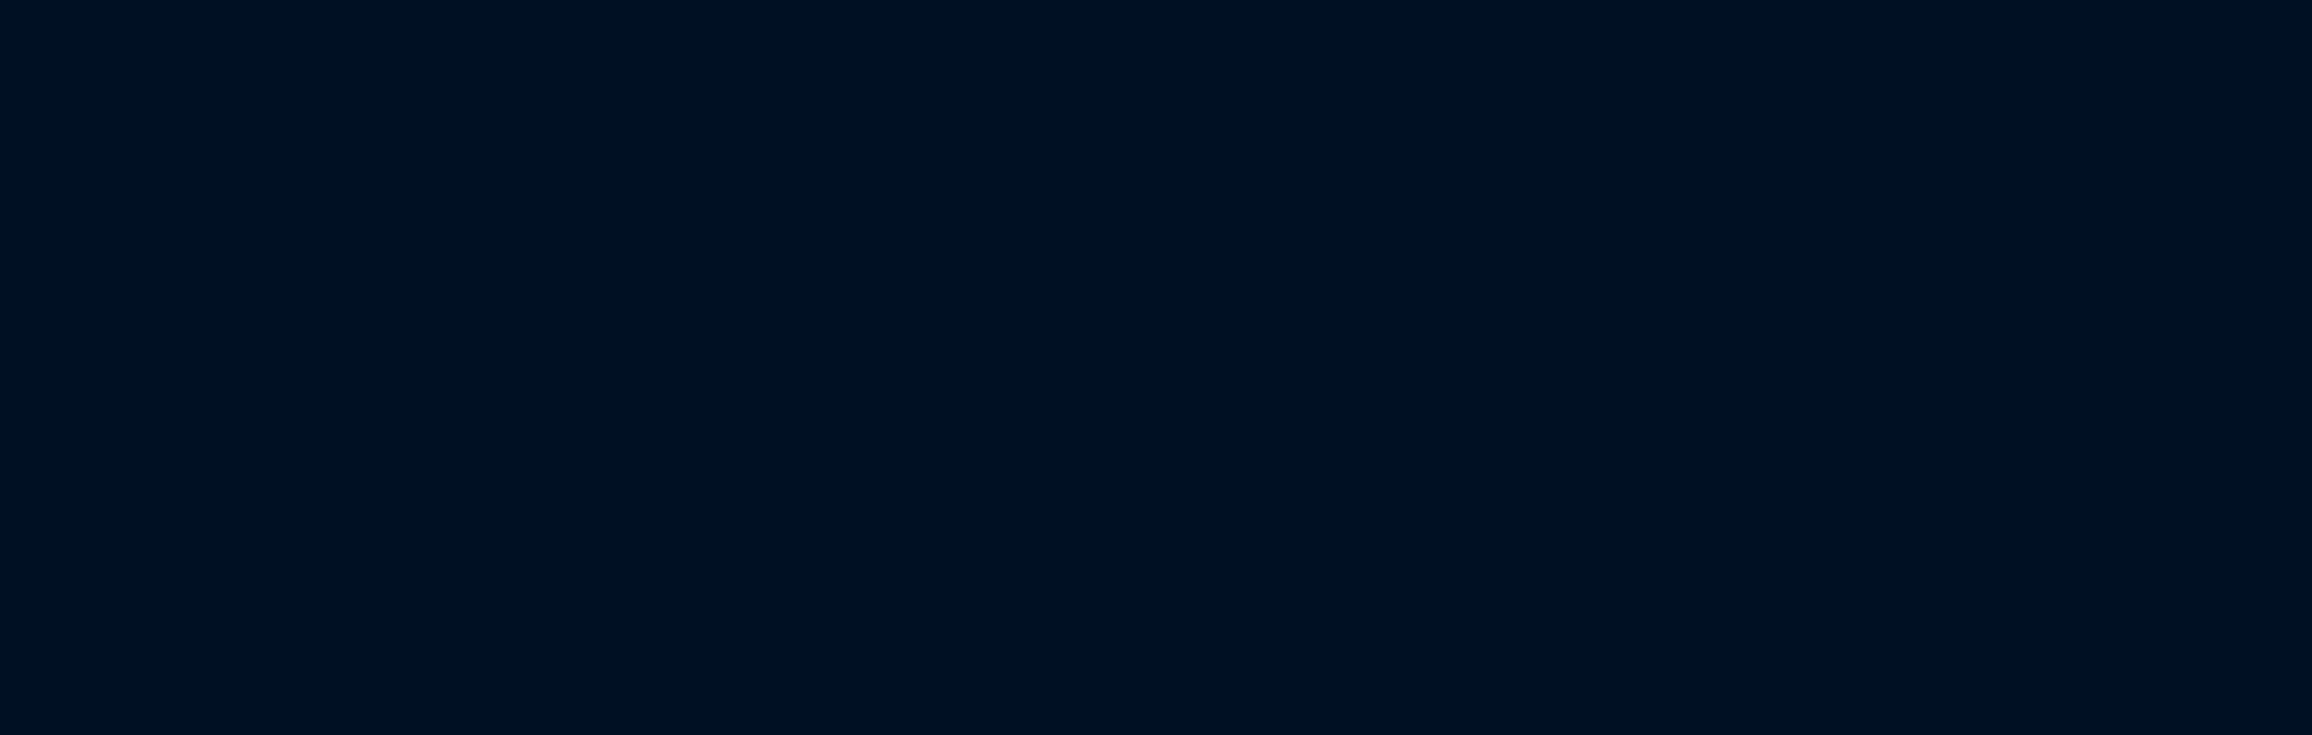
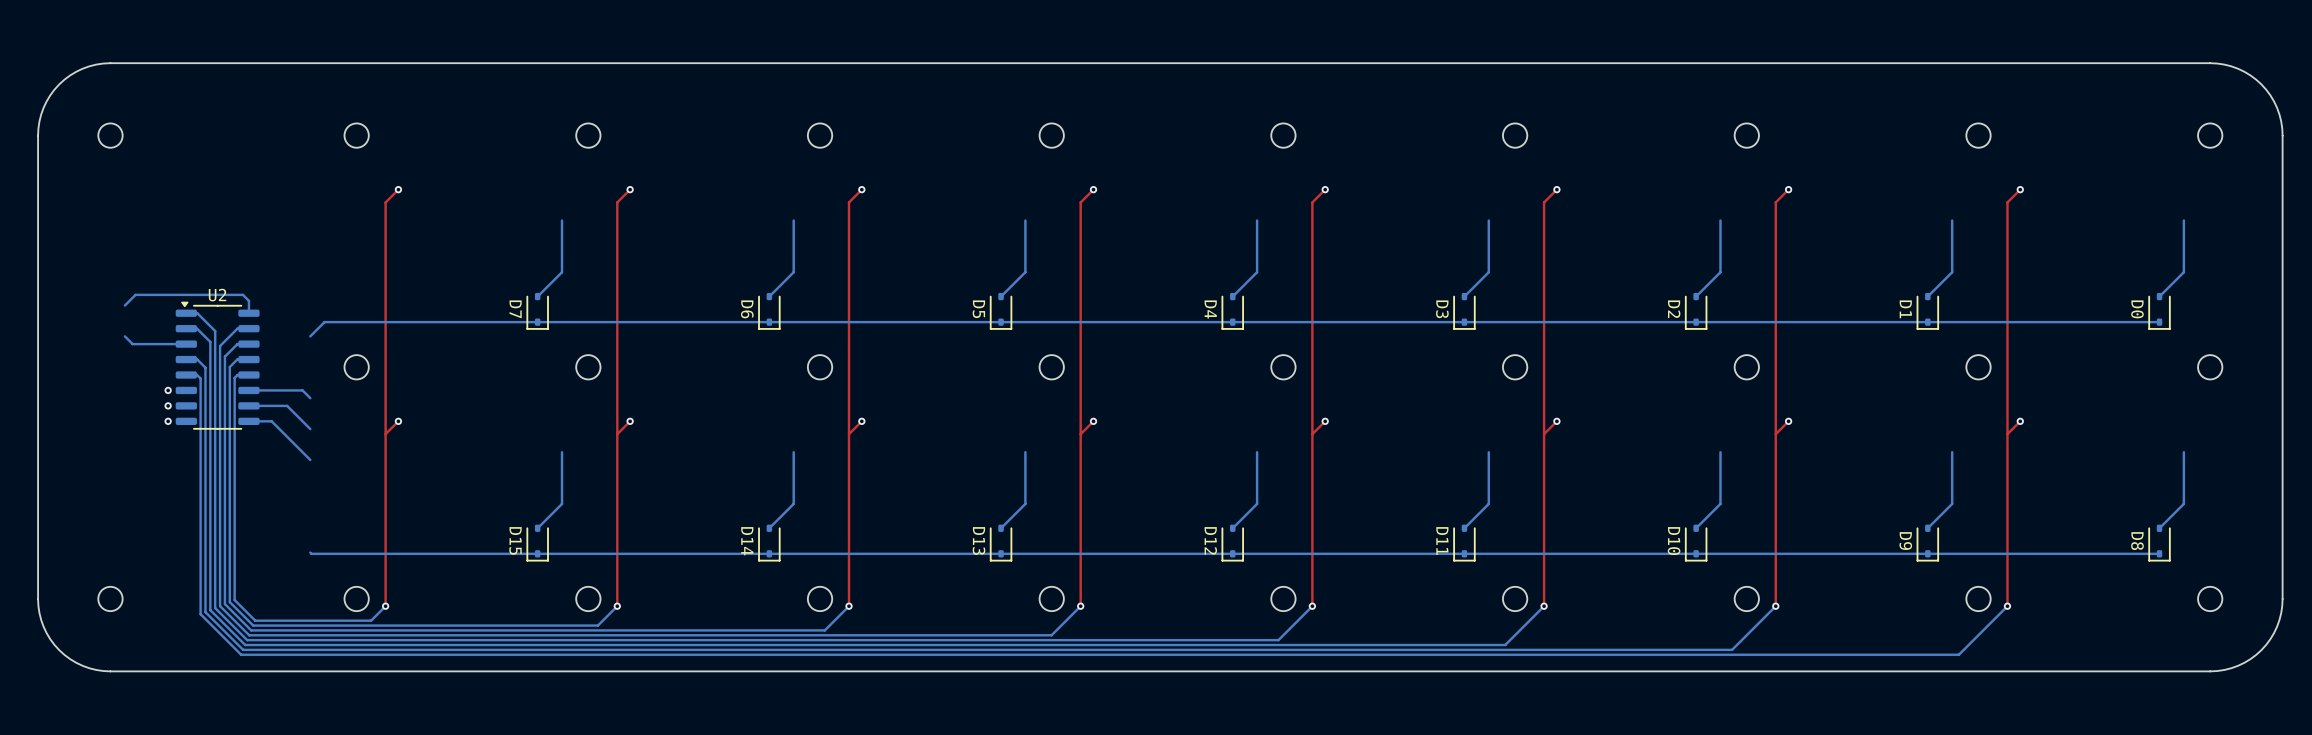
board edge: none -> (2210, 63) (110, 63) (89, 66) (70, 75) (54, 89) (43, 107) (38, 128) (38, 598) (41, 619) (50, 639) (64, 654) (82, 665) (110, 671) (2210, 671) (2231, 668) (2250, 659) (2266, 644) (2277, 626) (2282, 606) (2282, 135) (2277, 107) (2261, 84) (2237, 68) (2210, 63)
round board edge: none -> [98, 123, 123, 149]
round board edge: none -> [344, 123, 370, 149]
round board edge: none -> [575, 123, 601, 149]
round board edge: none -> [807, 123, 833, 149]
round board edge: none -> [1039, 123, 1065, 149]
round board edge: none -> [1270, 123, 1296, 149]
round board edge: none -> [1502, 123, 1528, 149]
round board edge: none -> [1734, 123, 1760, 149]
round board edge: none -> [1966, 123, 1991, 149]
round board edge: none -> [2197, 123, 2223, 149]
top track: none -> (398, 189) (385, 202) (385, 606)
via: none -> (398, 189)
top track: none -> (630, 189) (617, 202) (617, 606)
via: none -> (630, 189)
top track: none -> (861, 189) (849, 202) (849, 606)
via: none -> (861, 189)
top track: none -> (1093, 189) (1080, 202) (1080, 606)
via: none -> (1093, 189)
top track: none -> (1325, 189) (1312, 202) (1312, 606)
via: none -> (1325, 189)
top track: none -> (1556, 189) (1544, 202) (1544, 606)
via: none -> (1556, 189)
top track: none -> (1788, 189) (1775, 202) (1775, 606)
via: none -> (1788, 189)
top track: none -> (2020, 189) (2007, 202) (2007, 606)
via: none -> (2020, 189)
bottom track: none -> (562, 220) (562, 272) (537, 296)
bottom track: none -> (793, 220) (793, 272) (769, 296)
bottom track: none -> (1025, 220) (1025, 272) (1001, 296)
bottom track: none -> (1257, 220) (1257, 272) (1232, 296)
bottom track: none -> (1488, 220) (1488, 272) (1464, 296)
bottom track: none -> (1720, 220) (1720, 272) (1696, 296)
bottom track: none -> (1952, 220) (1952, 272) (1927, 296)
bottom track: none -> (2183, 220) (2183, 272) (2159, 296)
bottom track: none -> (124, 305) (135, 294) (242, 294) (248, 300) (248, 313)
D7: none -> (537, 311)
D6: none -> (769, 311)
D5: none -> (1001, 311)
D4: none -> (1232, 311)
D3: none -> (1464, 311)
D2: none -> (1696, 311)
D1: none -> (1927, 311)
D0: none -> (2159, 311)
bottom track: none -> (186, 313) (197, 313) (215, 331) (215, 608) (247, 640) (1278, 640) (1312, 606)
bottom track: none -> (2159, 322) (324, 322) (310, 336)
bottom track: none -> (186, 328) (197, 328) (210, 341) (210, 610) (245, 645) (1505, 645) (1544, 606)
bottom track: none -> (248, 328) (237, 328) (220, 346) (220, 606) (249, 635) (1051, 635) (1080, 606)
bottom track: none -> (124, 336) (132, 344) (186, 344)
bottom track: none -> (248, 344) (237, 344) (224, 356) (224, 604) (251, 630) (824, 630) (849, 606)
round board edge: none -> [344, 354, 370, 380]
round board edge: none -> [575, 354, 601, 380]
round board edge: none -> [807, 354, 833, 380]
round board edge: none -> [1039, 354, 1065, 380]
round board edge: none -> [1270, 354, 1296, 380]
round board edge: none -> [1502, 354, 1528, 380]
round board edge: none -> [1734, 354, 1760, 380]
round board edge: none -> [1966, 354, 1991, 380]
round board edge: none -> [2197, 354, 2223, 380]
bottom track: none -> (186, 359) (197, 359) (205, 367) (205, 612) (243, 649) (1732, 649) (1775, 606)
bottom track: none -> (248, 359) (237, 359) (229, 367) (229, 602) (253, 625) (597, 625) (617, 606)
U2: none -> (217, 365)
bottom track: none -> (186, 375) (197, 375) (200, 378) (200, 614) (241, 654) (1958, 654) (2007, 606)
bottom track: none -> (248, 375) (237, 375) (234, 377) (234, 600) (255, 620) (371, 620) (385, 606)
via: none -> (168, 390)
bottom track: none -> (248, 390) (302, 390) (310, 398)
via: none -> (168, 405)
bottom track: none -> (248, 405) (287, 405) (310, 429)
via: none -> (168, 421)
bottom track: none -> (248, 421) (271, 421) (310, 459)
top track: none -> (398, 421) (385, 434)
via: none -> (398, 421)
top track: none -> (630, 421) (617, 434)
via: none -> (630, 421)
top track: none -> (861, 421) (849, 434)
via: none -> (861, 421)
top track: none -> (1093, 421) (1080, 434)
via: none -> (1093, 421)
top track: none -> (1325, 421) (1312, 434)
via: none -> (1325, 421)
top track: none -> (1556, 421) (1544, 434)
via: none -> (1556, 421)
top track: none -> (1788, 421) (1775, 434)
via: none -> (1788, 421)
top track: none -> (2020, 421) (2007, 434)
via: none -> (2020, 421)
bottom track: none -> (562, 452) (562, 503) (537, 528)
bottom track: none -> (793, 452) (793, 503) (769, 528)
bottom track: none -> (1025, 452) (1025, 503) (1001, 528)
bottom track: none -> (1257, 452) (1257, 503) (1232, 528)
bottom track: none -> (1488, 452) (1488, 503) (1464, 528)
bottom track: none -> (1720, 452) (1720, 503) (1696, 528)
bottom track: none -> (1952, 452) (1952, 503) (1927, 528)
bottom track: none -> (2183, 452) (2183, 503) (2159, 528)
D15: none -> (537, 543)
D14: none -> (769, 543)
D13: none -> (1001, 543)
D12: none -> (1232, 543)
D11: none -> (1464, 543)
D10: none -> (1696, 543)
D9: none -> (1927, 543)
D8: none -> (2159, 543)
bottom track: none -> (310, 552) (2159, 553)
round board edge: none -> [98, 586, 123, 612]
round board edge: none -> [344, 586, 370, 612]
round board edge: none -> [575, 586, 601, 612]
round board edge: none -> [807, 586, 833, 612]
round board edge: none -> [1039, 586, 1065, 612]
round board edge: none -> [1270, 586, 1296, 612]
round board edge: none -> [1502, 586, 1528, 612]
round board edge: none -> [1734, 586, 1760, 612]
round board edge: none -> [1966, 586, 1991, 612]
round board edge: none -> [2197, 586, 2223, 612]
via: none -> (385, 606)
via: none -> (617, 606)
via: none -> (849, 606)
via: none -> (1080, 606)
via: none -> (1312, 606)
via: none -> (1544, 606)
via: none -> (1775, 606)
via: none -> (2007, 606)

